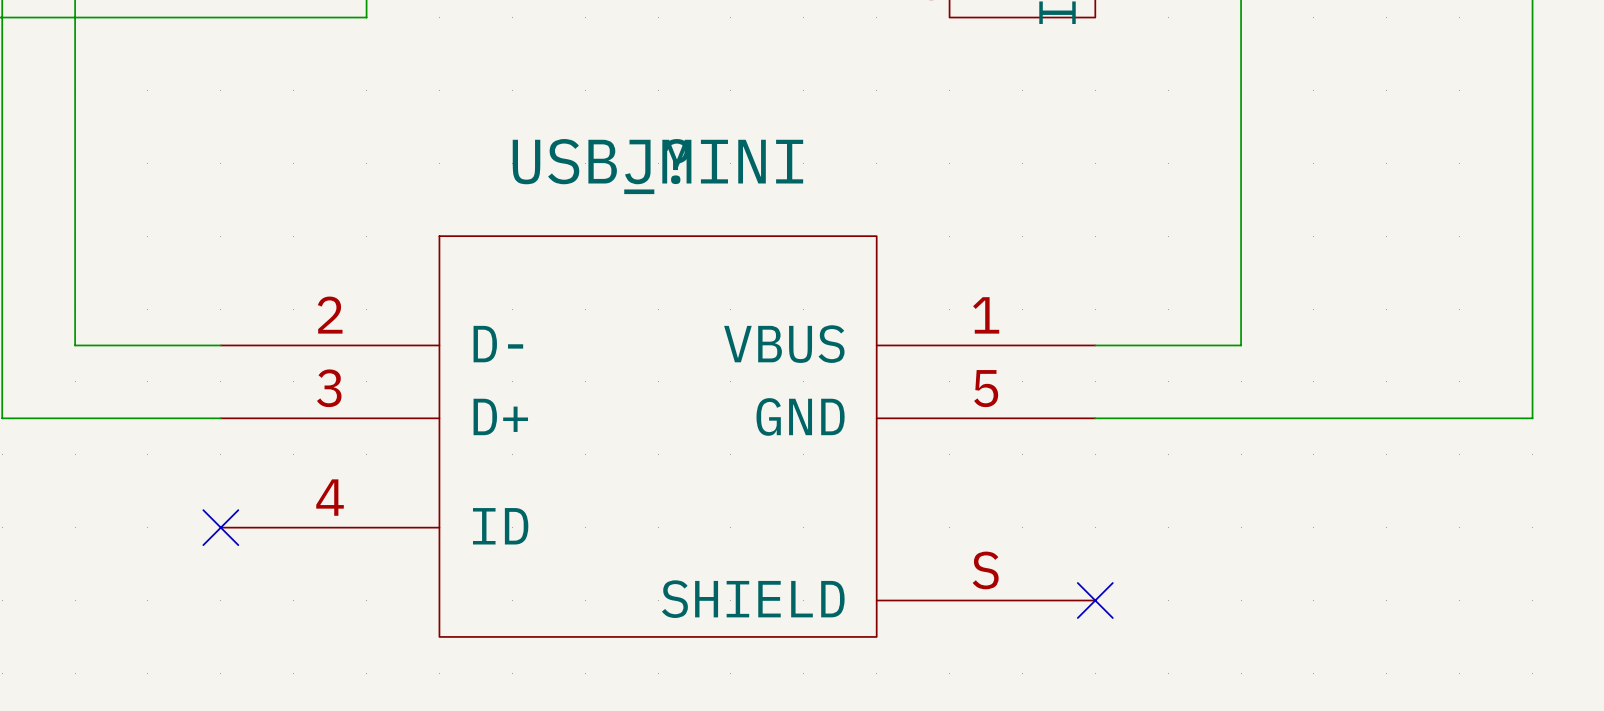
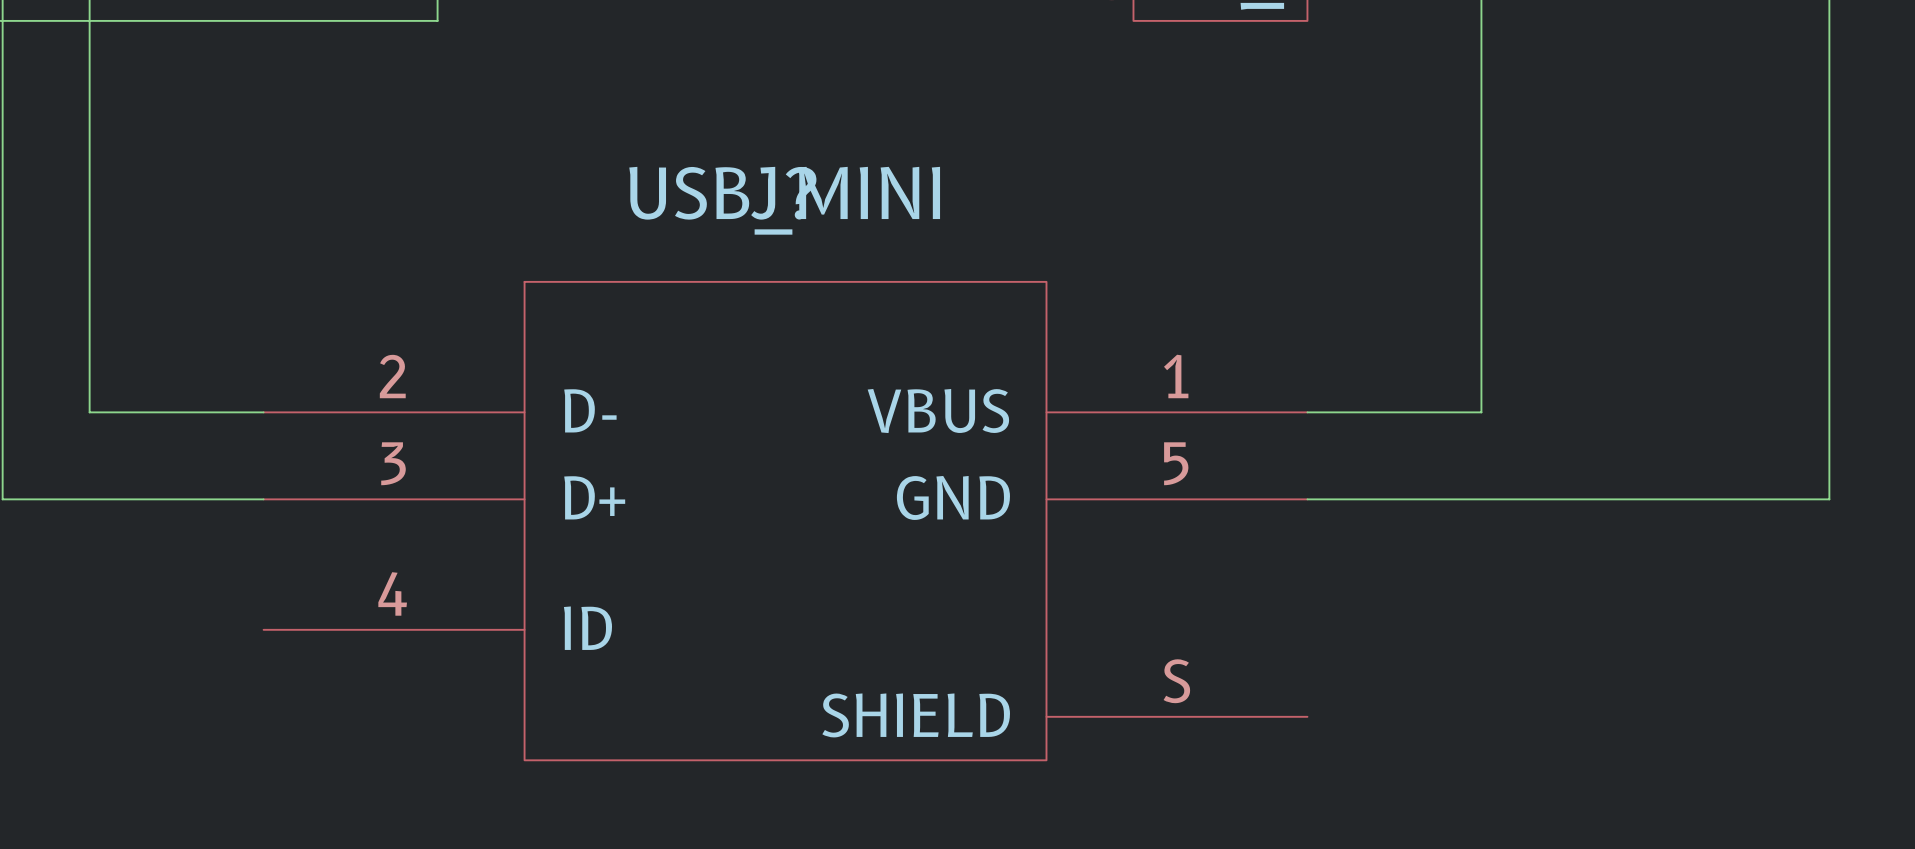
no-connect mark: (220, 527) -> none
no-connect mark: (1095, 600) -> none

